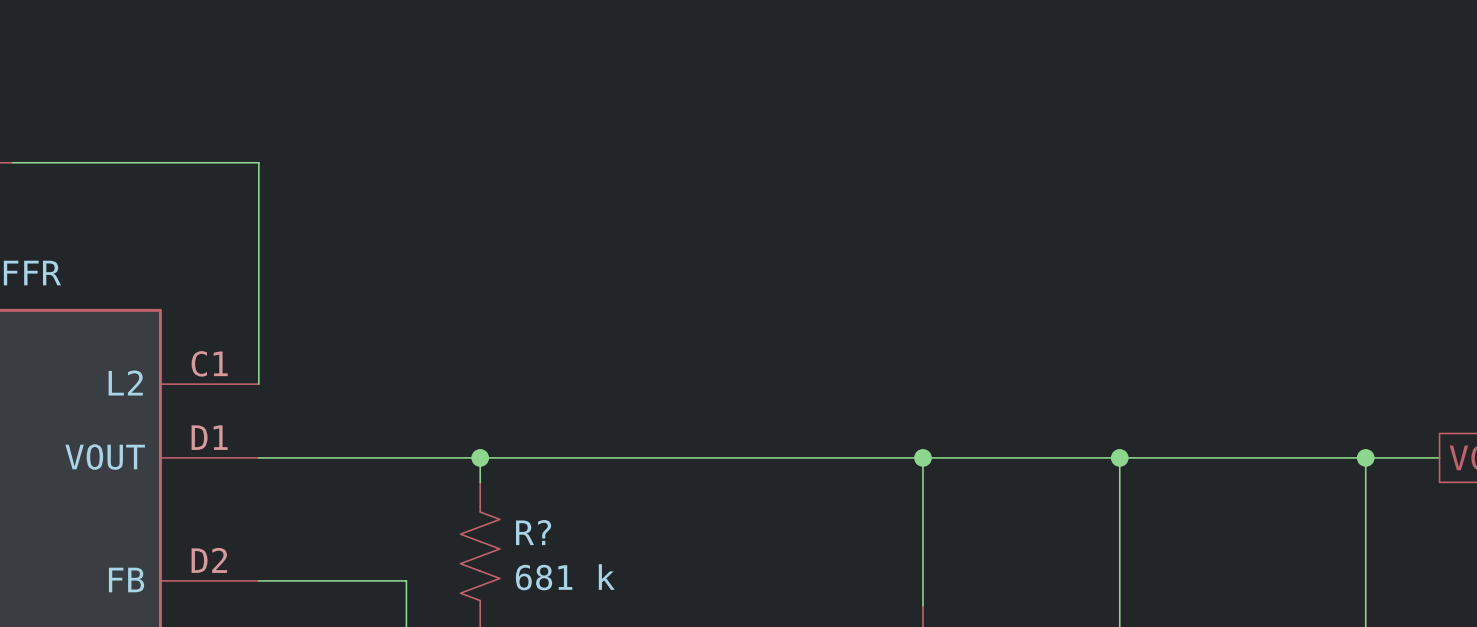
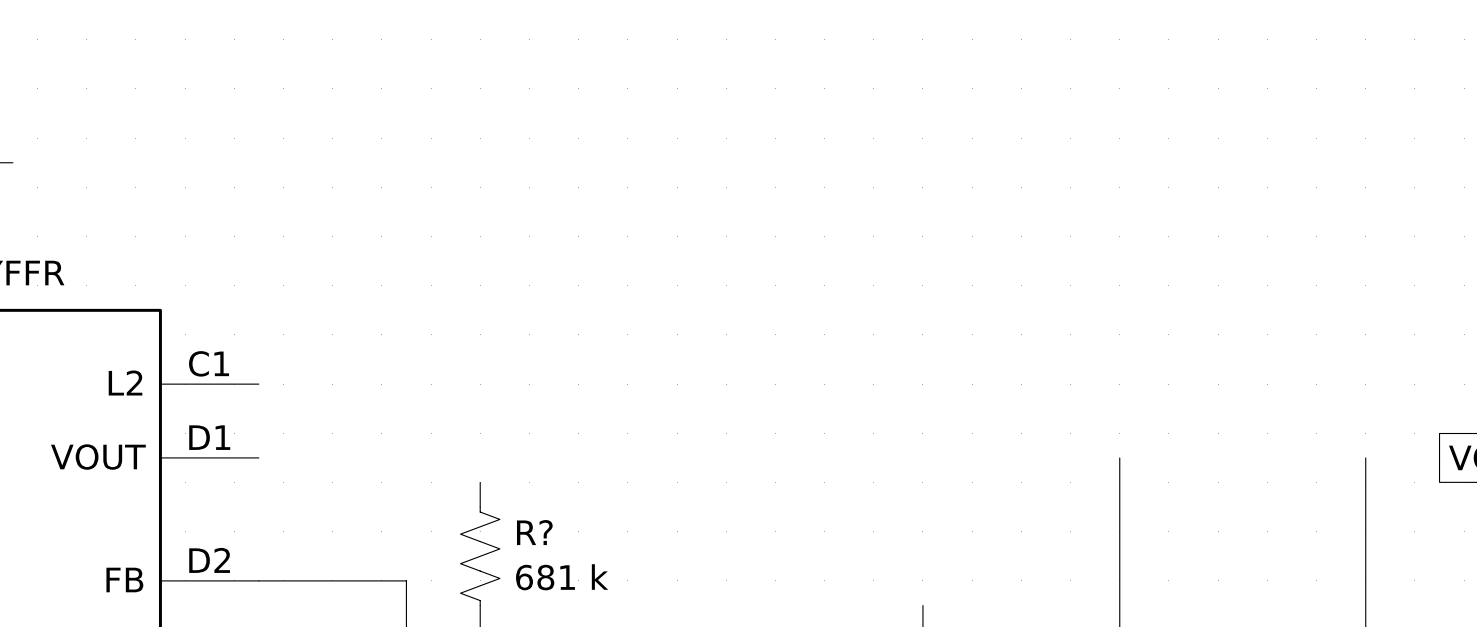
wire: (12, 162) (258, 162) (258, 384) -> none
wire: (258, 457) (1439, 457) -> none
wire: (480, 457) (480, 482) -> none
junction: (480, 457) -> none
wire: (922, 457) (922, 605) -> none
junction: (922, 457) -> none
junction: (1119, 457) -> none
junction: (1365, 457) -> none

